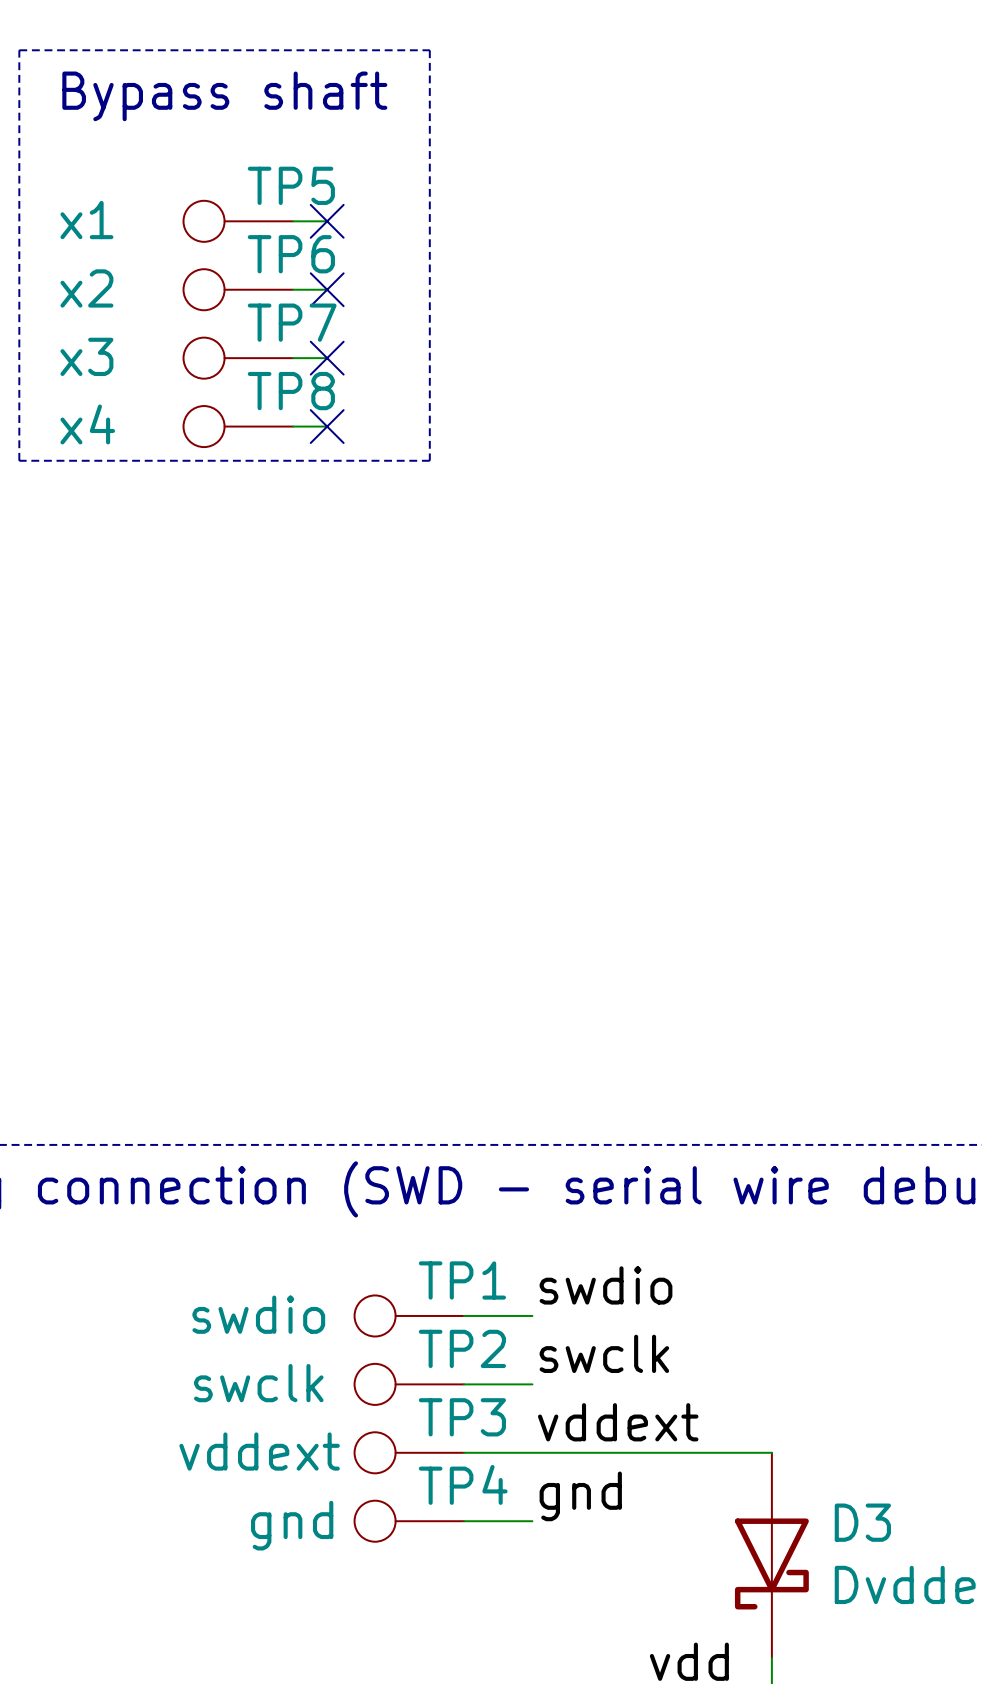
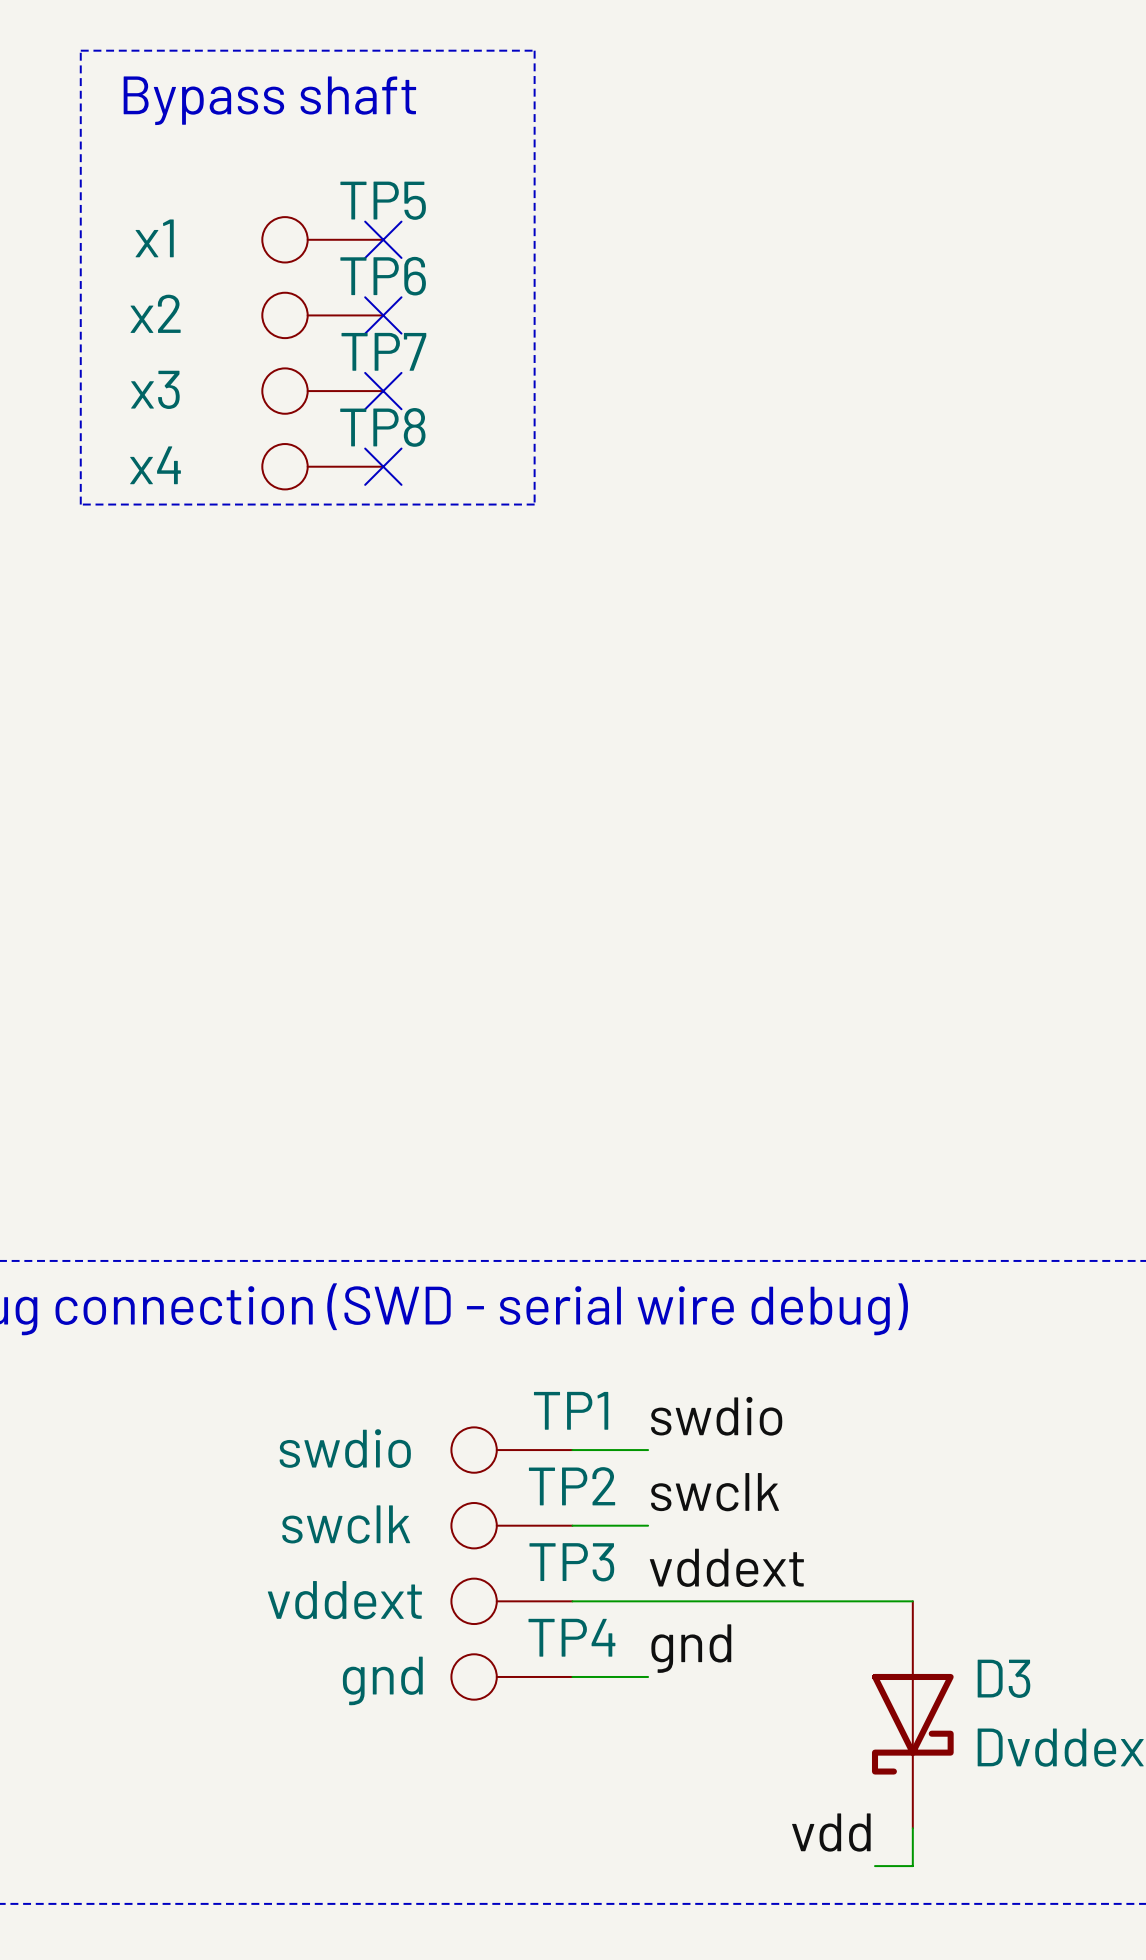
wire: (292, 221) (327, 221) -> none
no-connect mark position: (327, 221) -> (383, 239)
wire: (292, 289) (327, 289) -> none
no-connect mark position: (327, 289) -> (383, 315)
wire: (292, 358) (327, 358) -> none
no-connect mark position: (327, 358) -> (383, 391)
wire: (292, 426) (327, 426) -> none
no-connect mark position: (327, 426) -> (383, 466)

